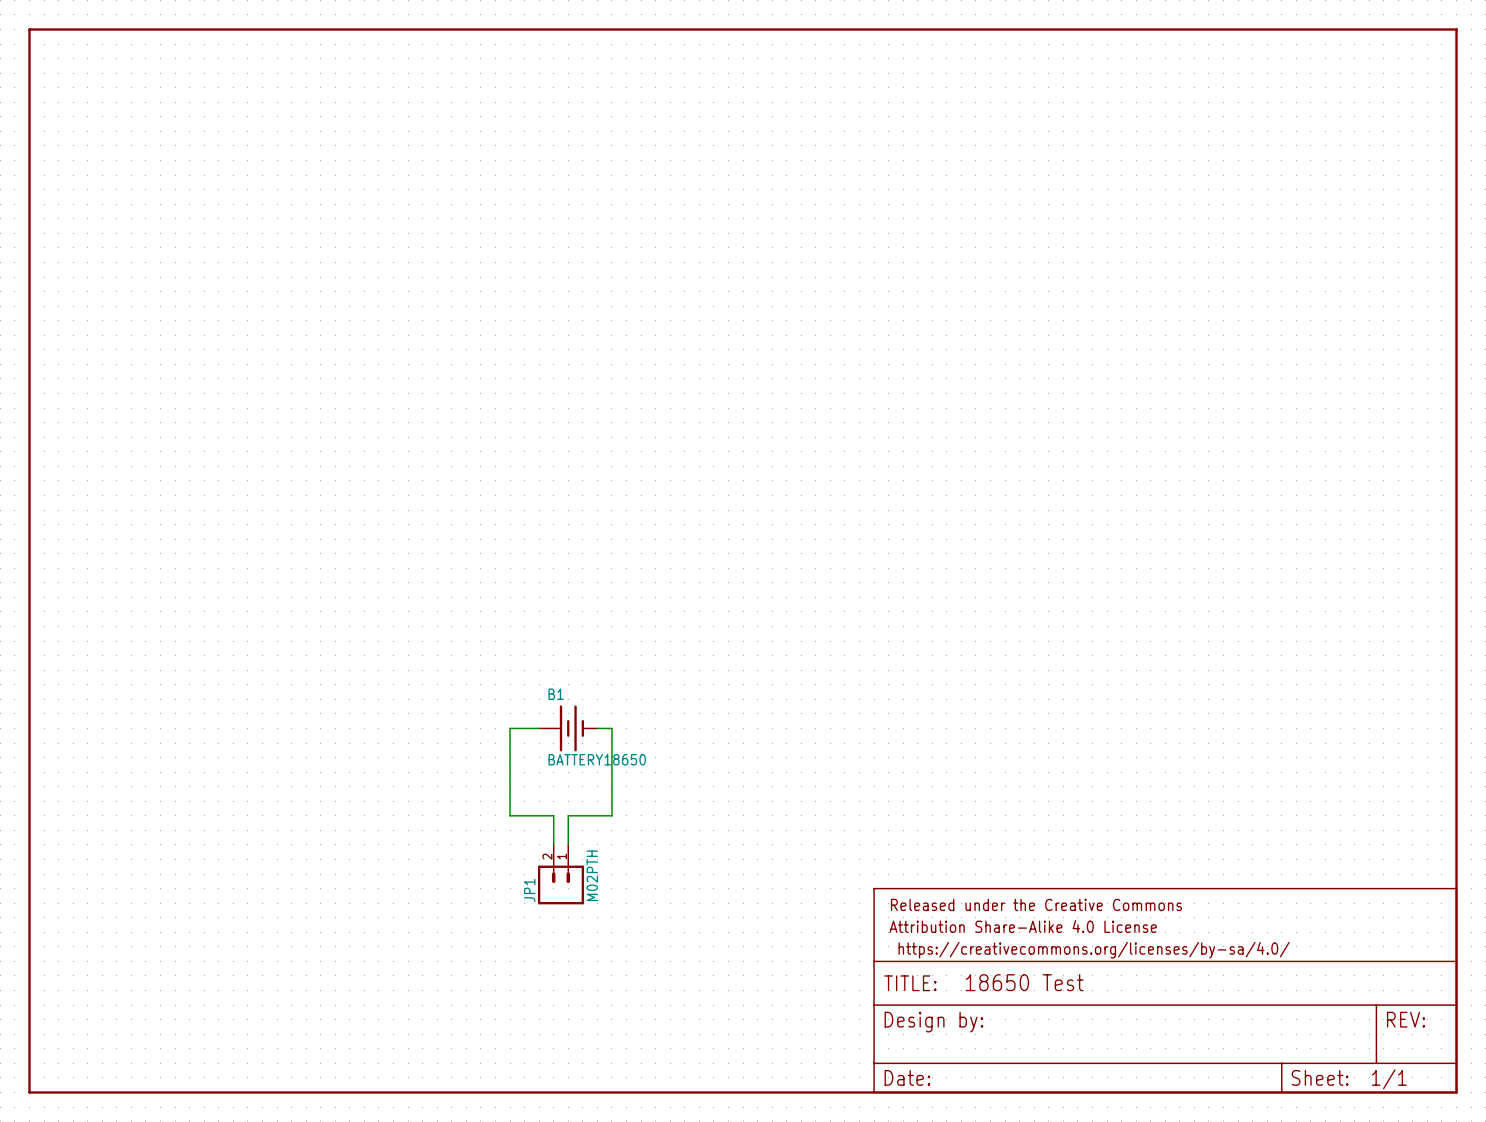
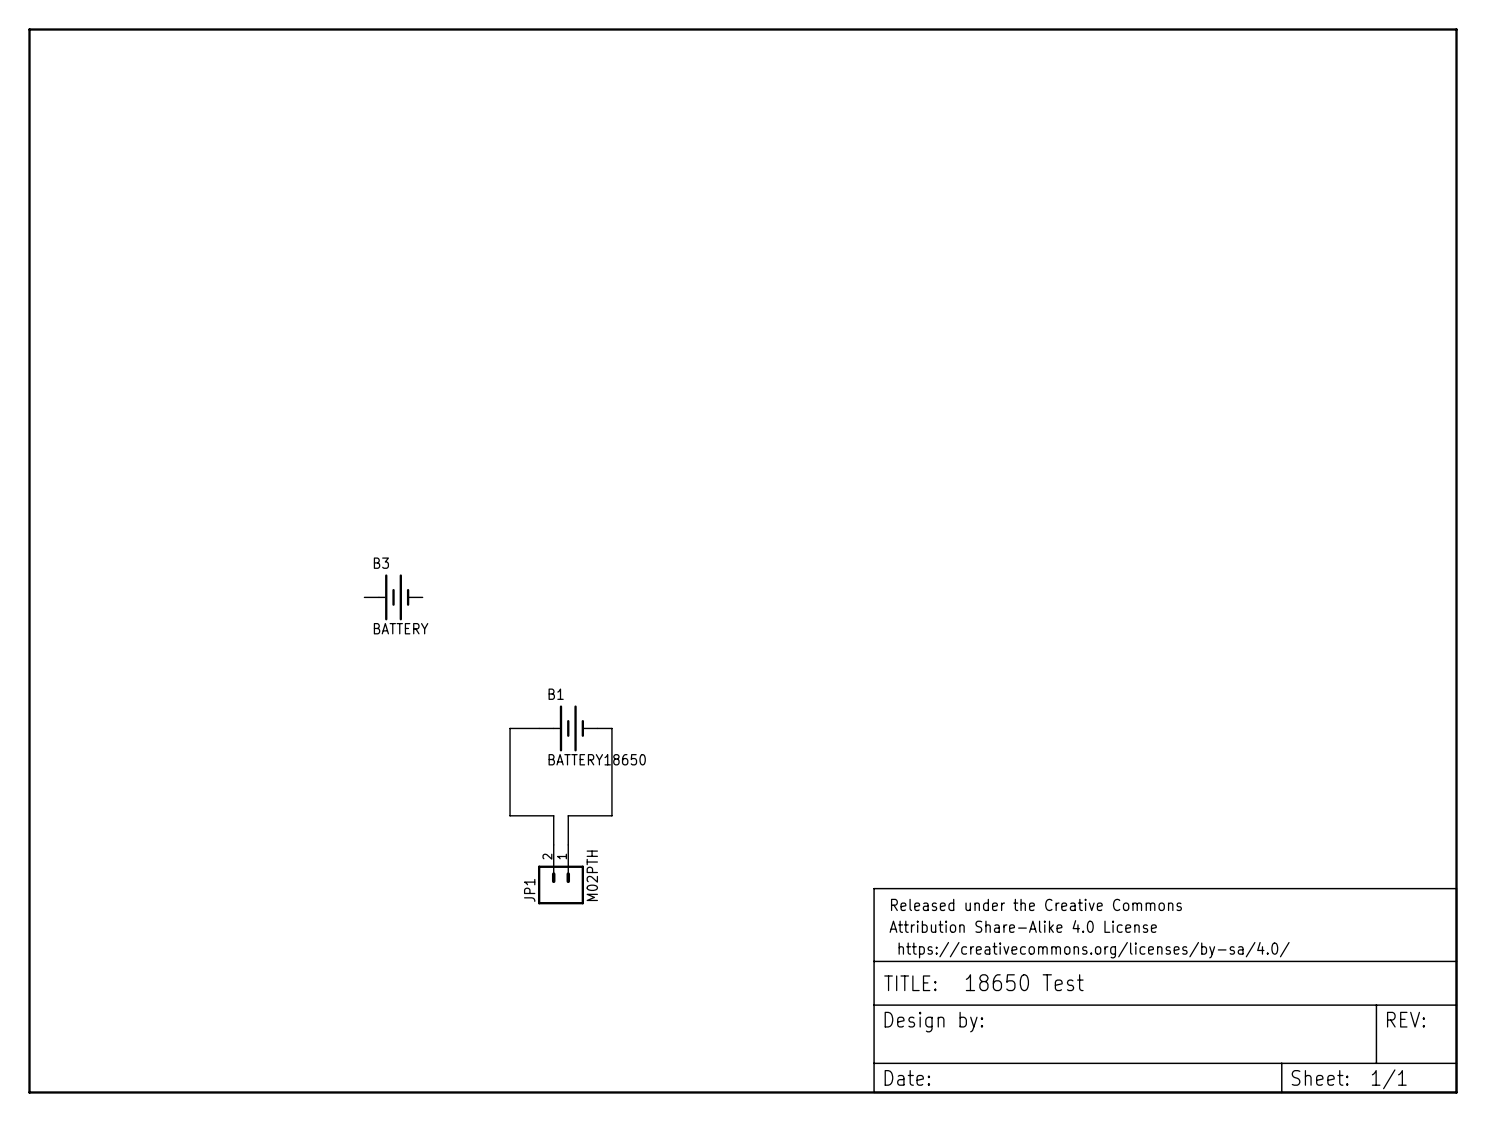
B3: none -> BATTERY (393, 597)

